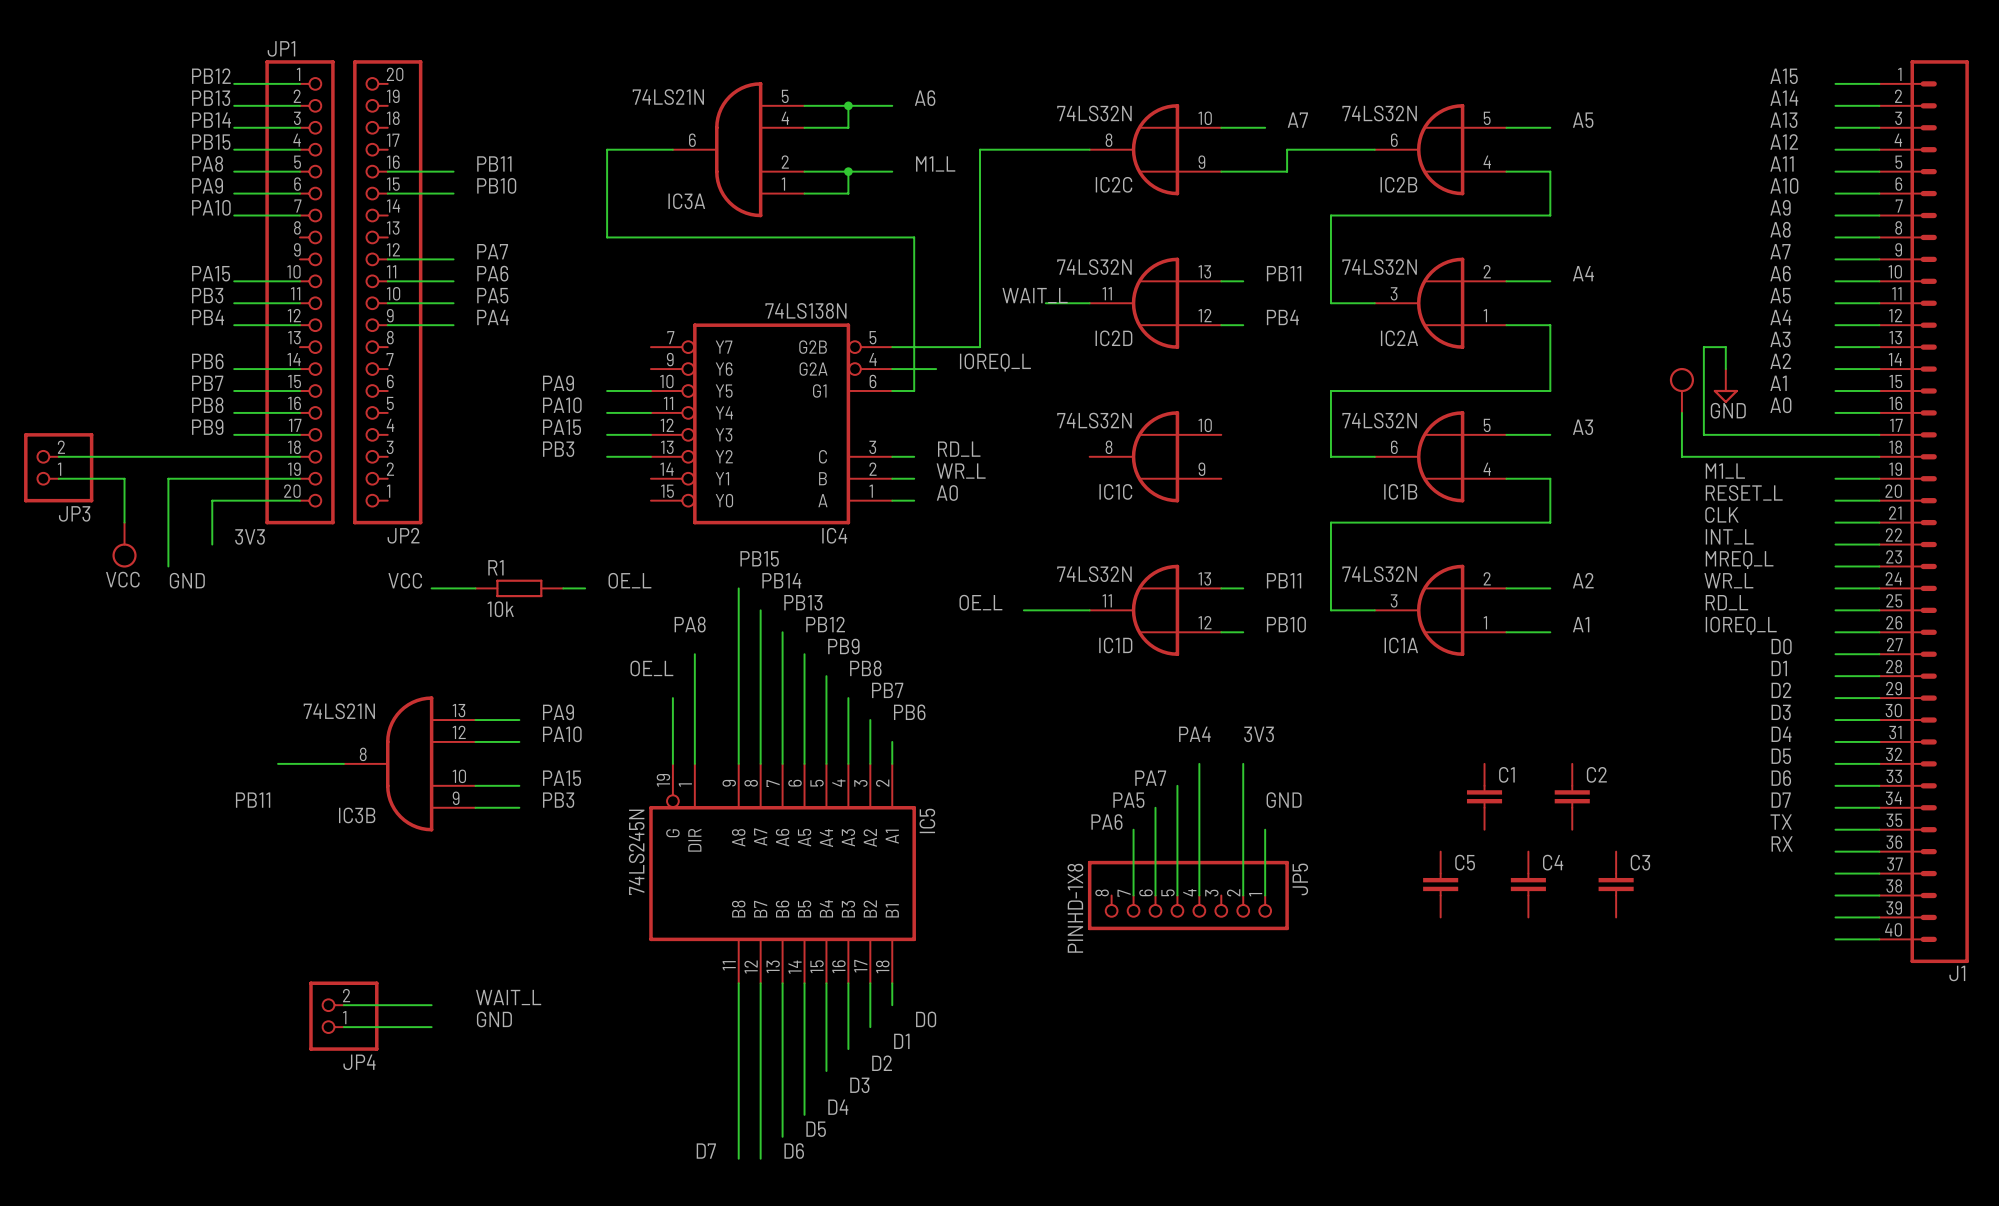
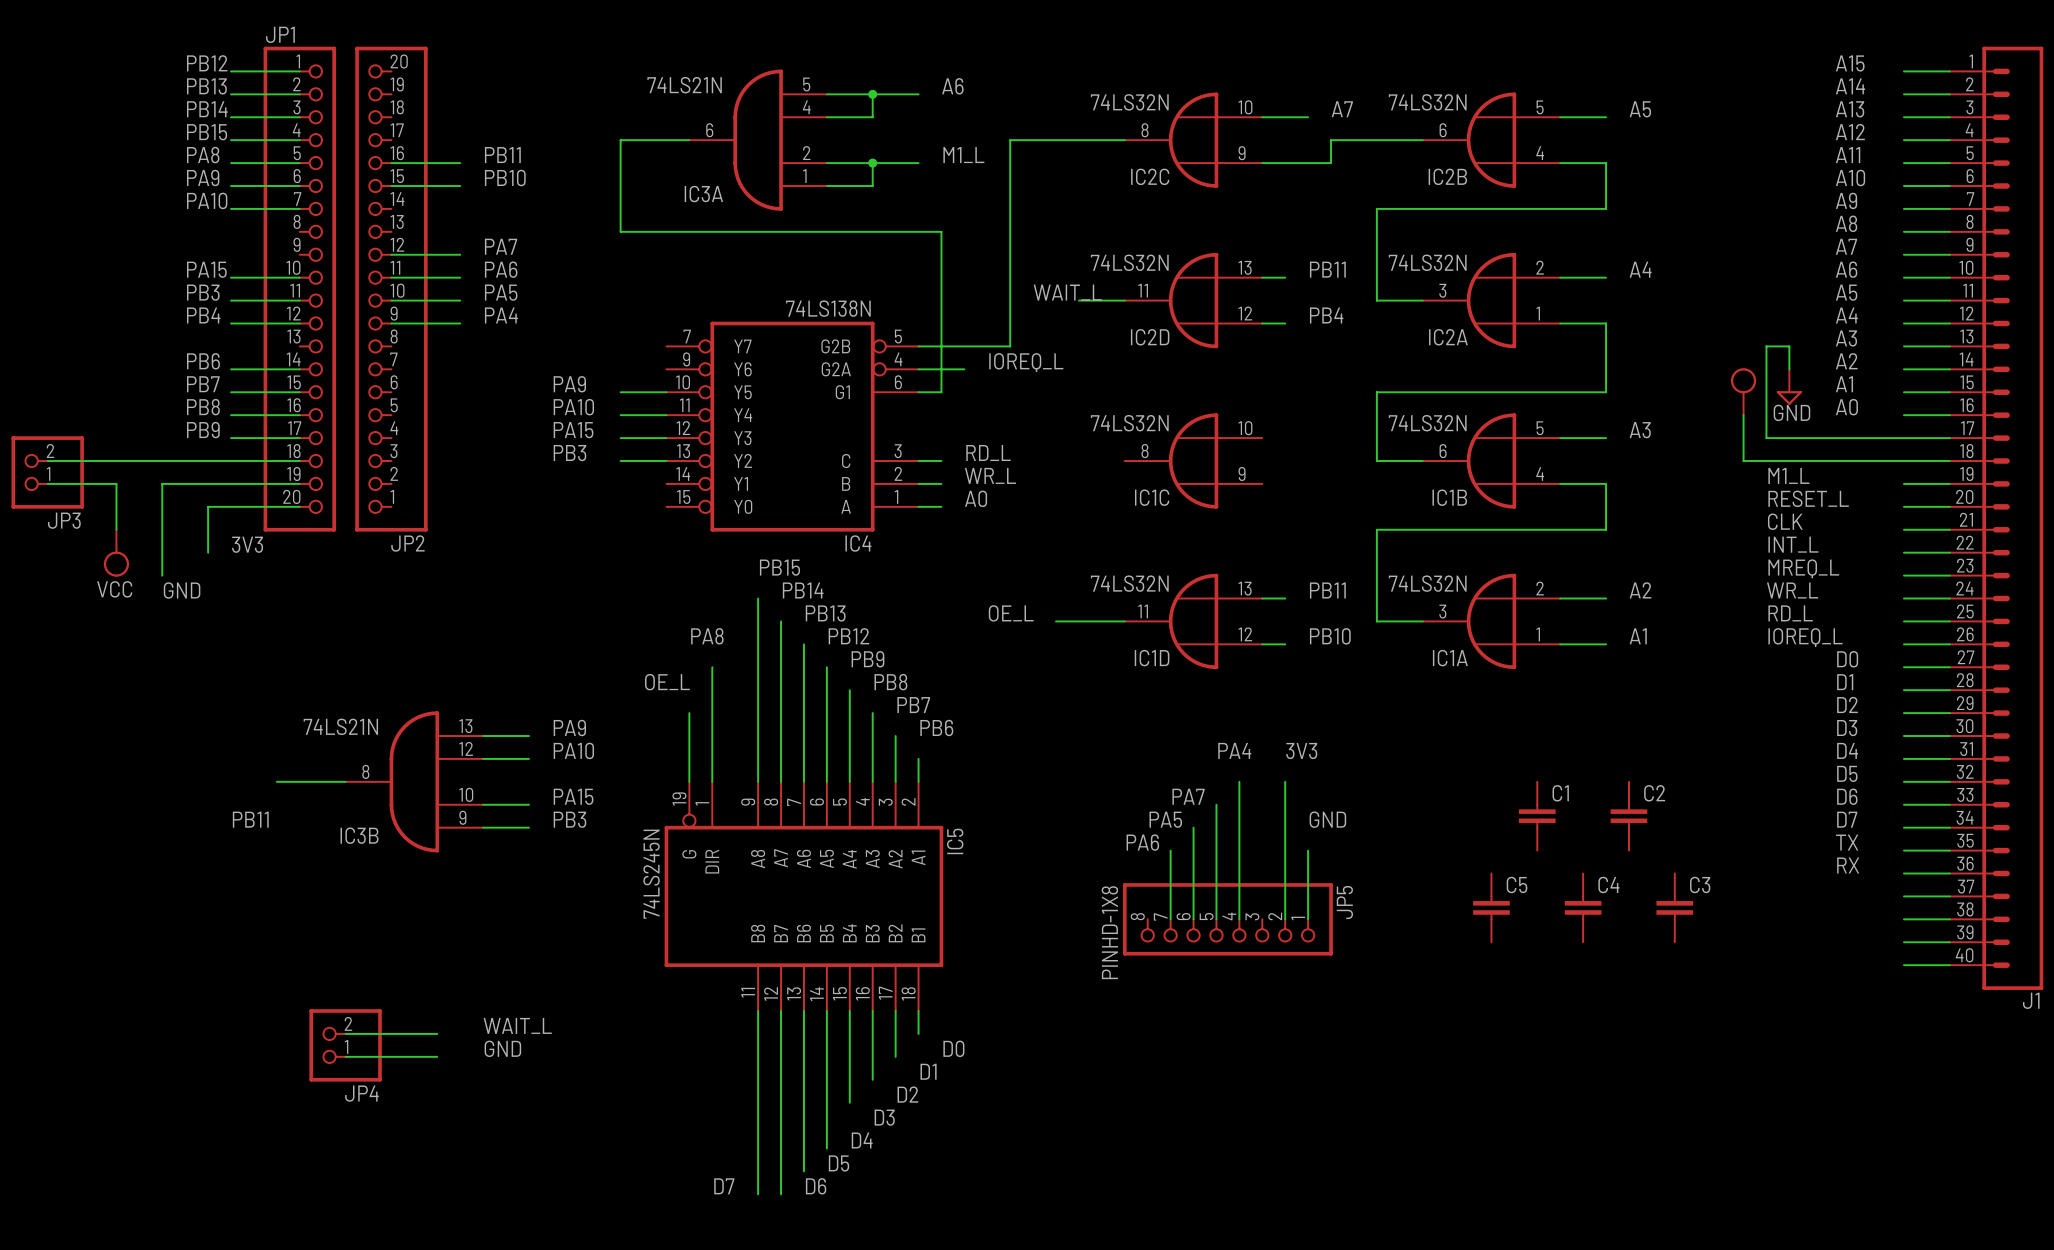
label: VCC (405, 580) -> none
label: OE_L (629, 580) -> none
wire: (431, 588) (475, 588) -> none
R1: 10k (519, 588) -> none
wire: (563, 588) (585, 588) -> none

